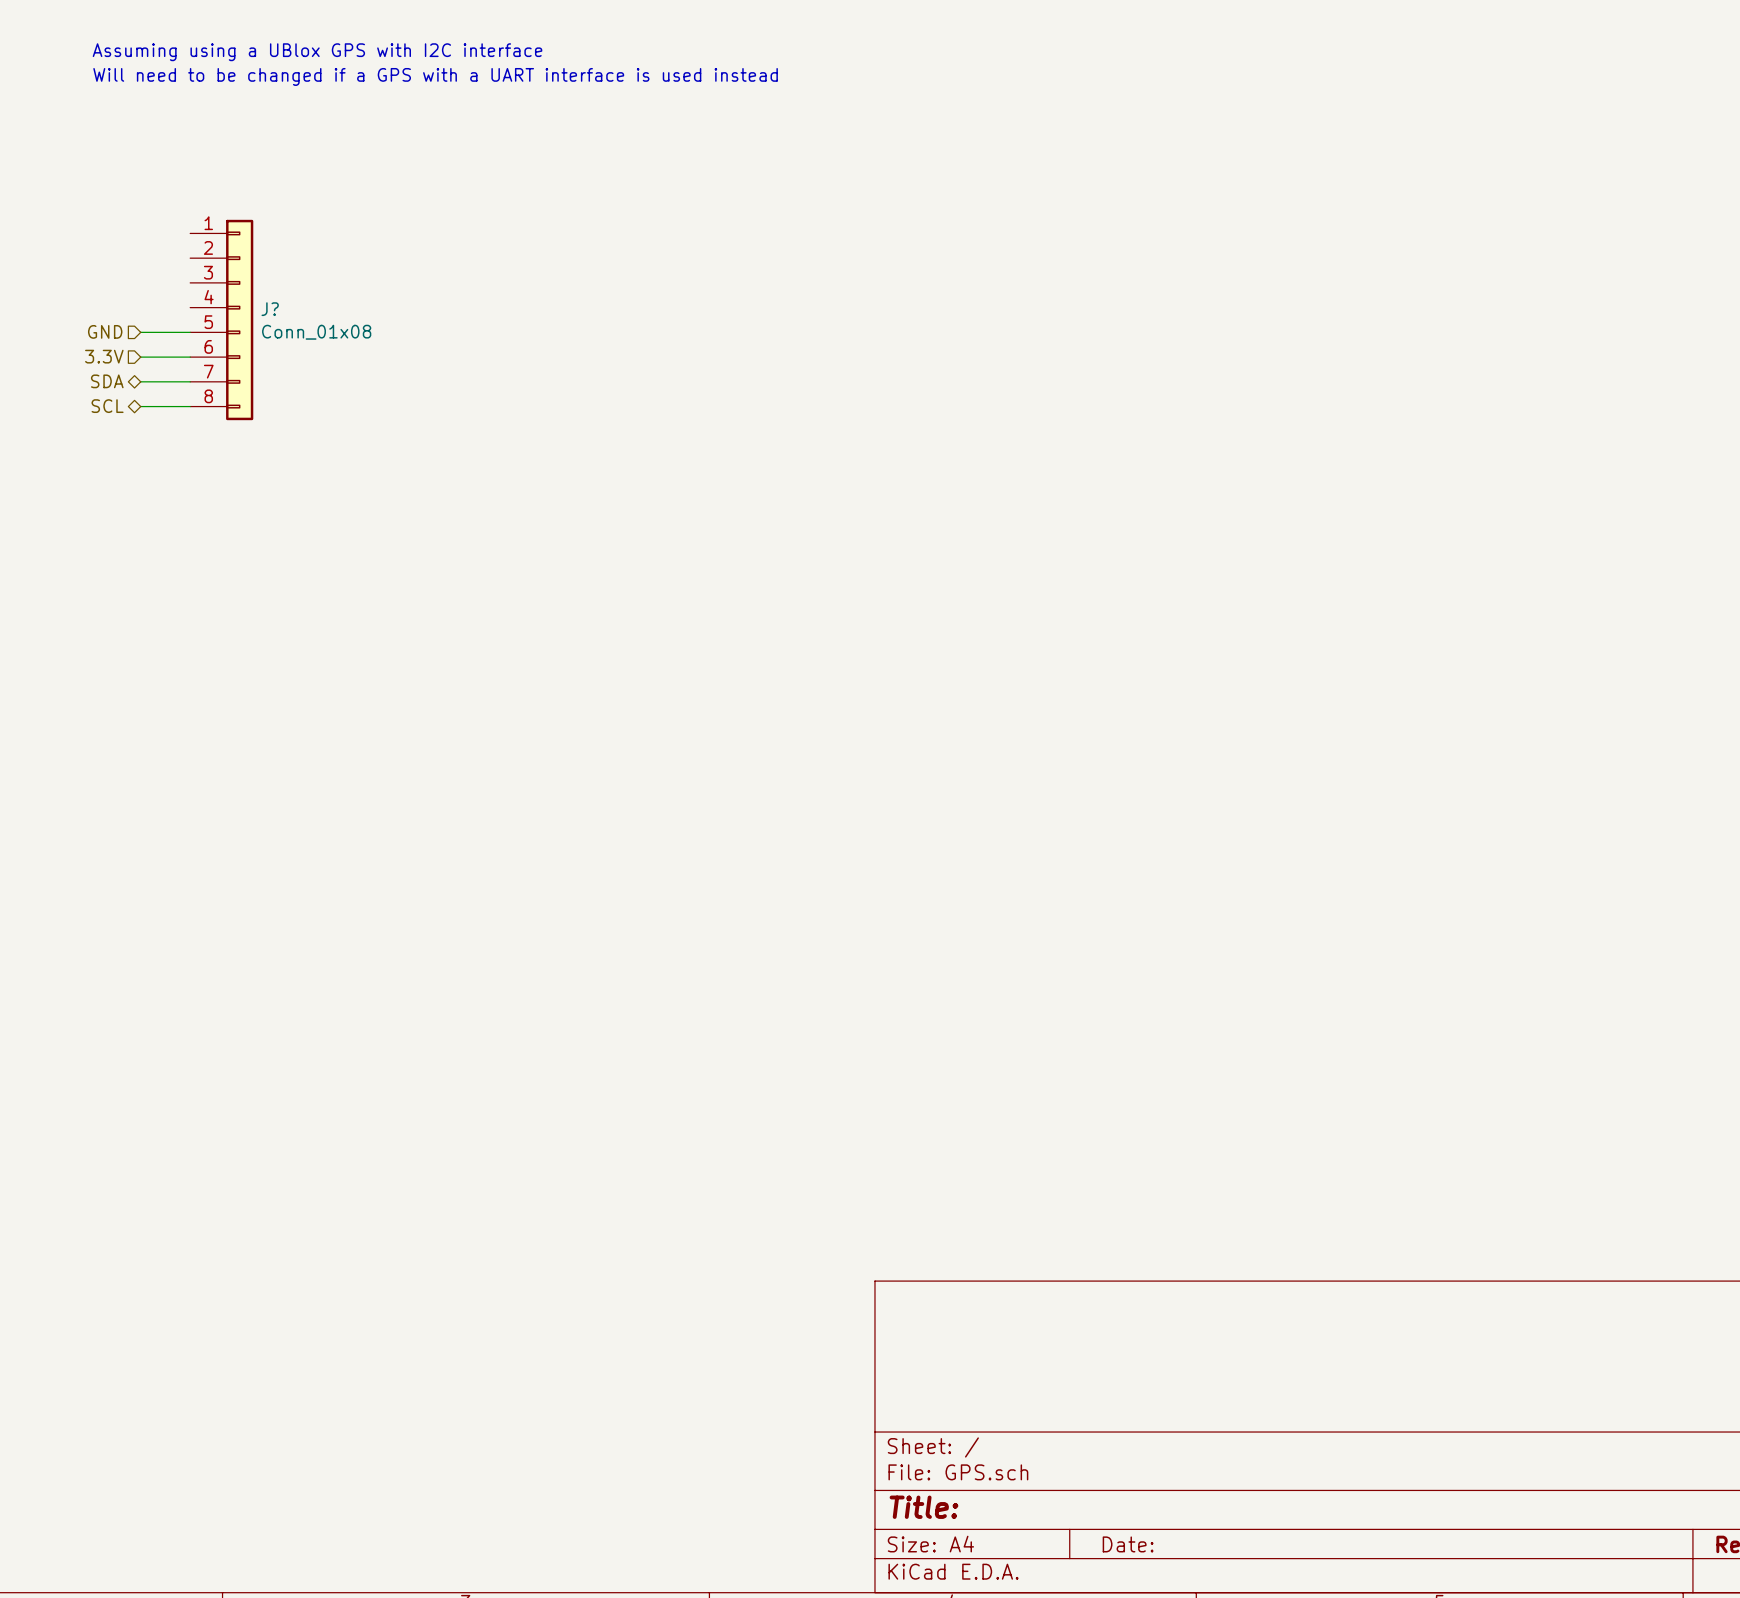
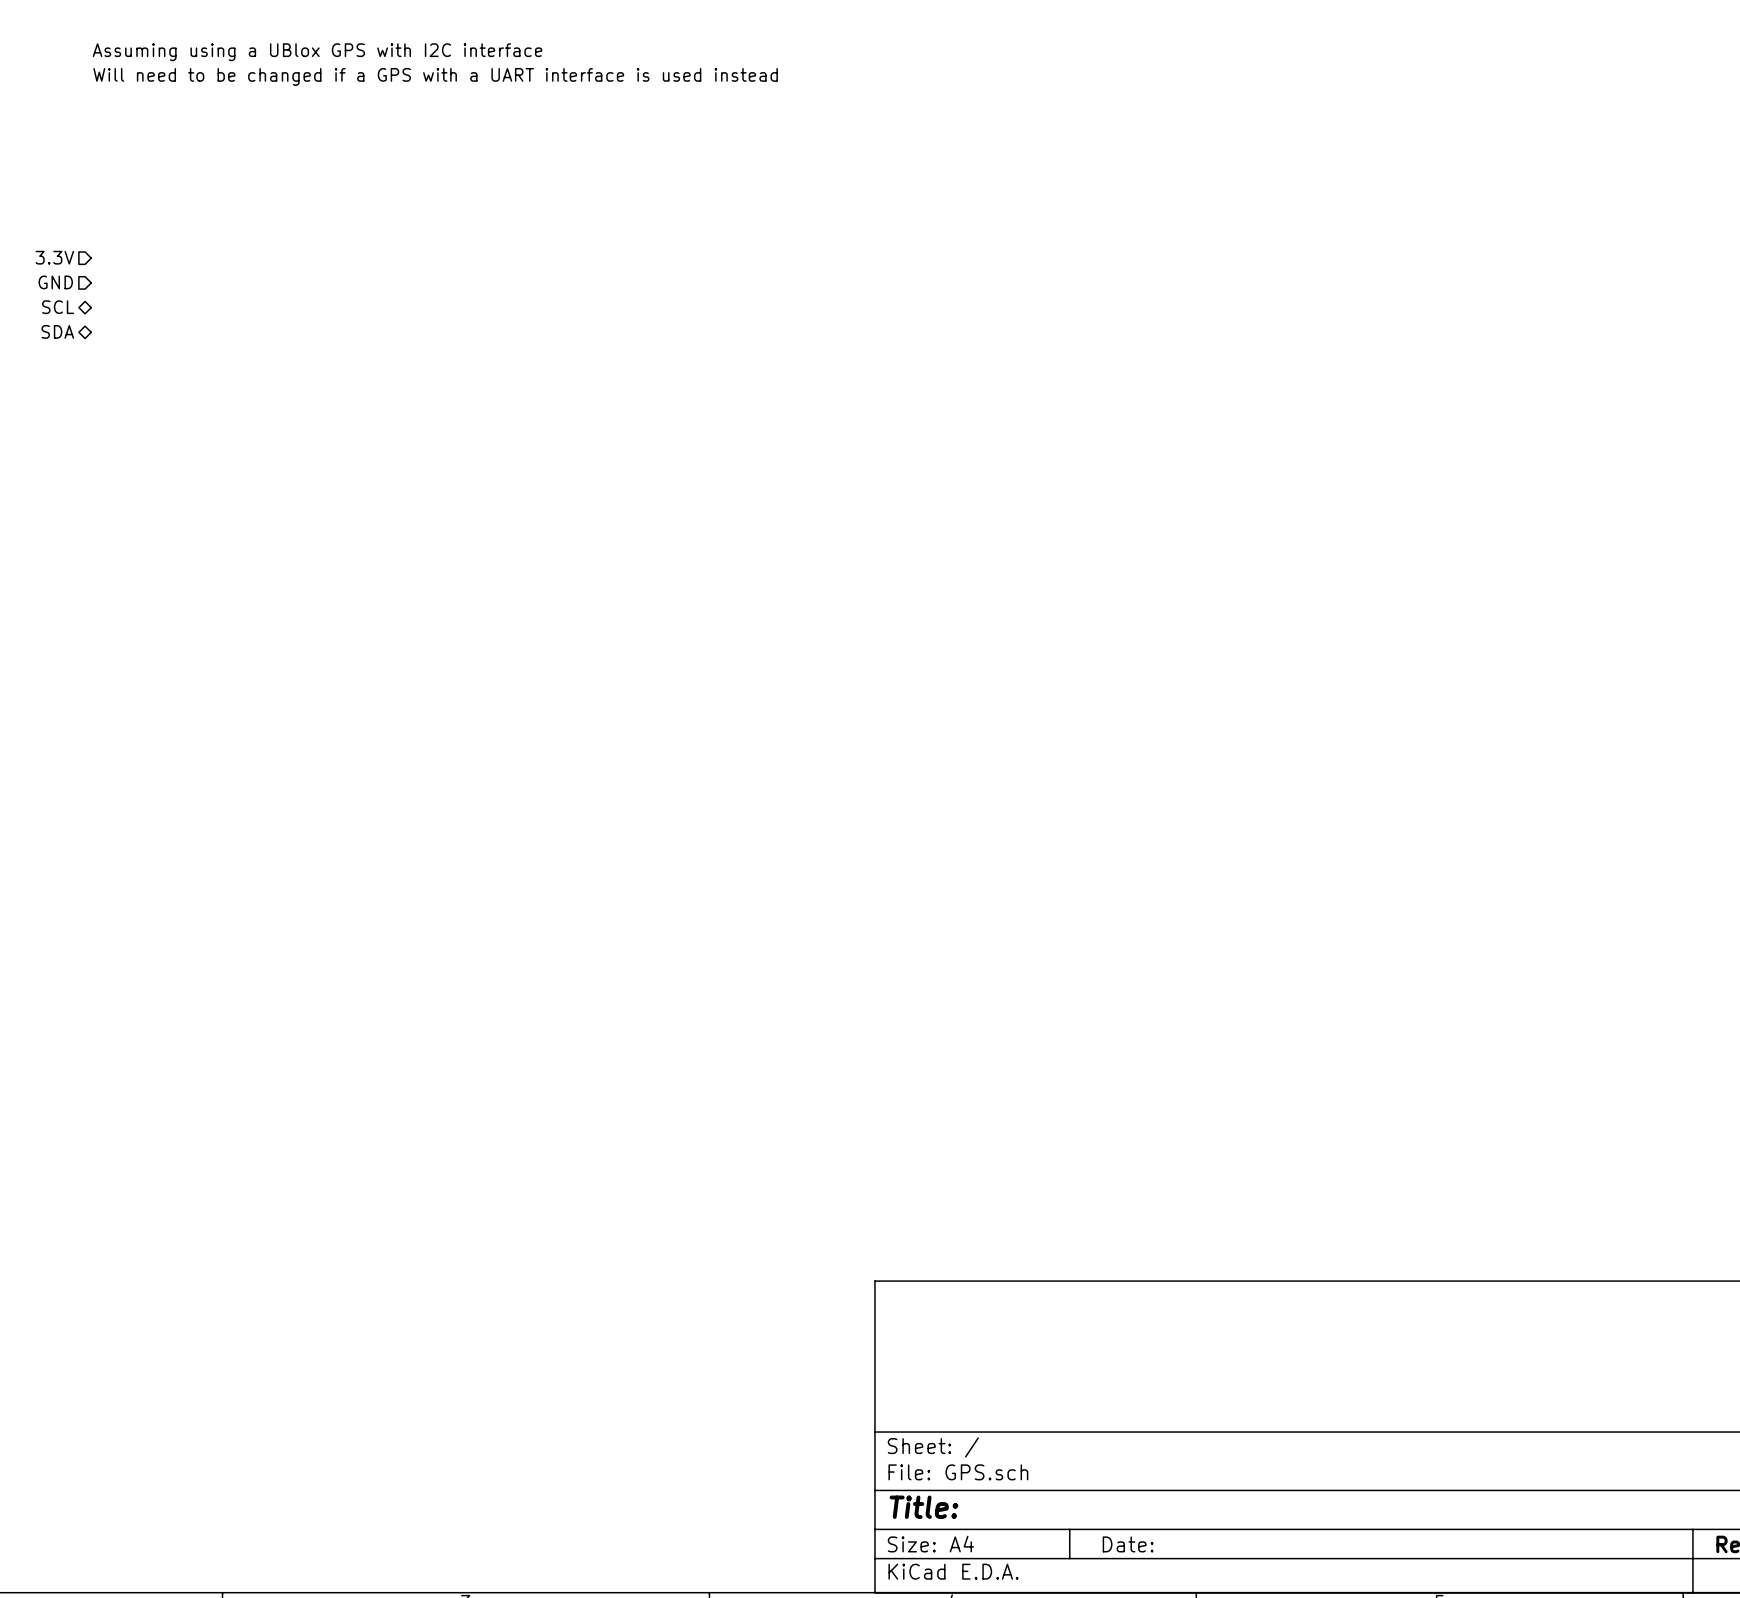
J?: Conn_01x08 (221, 320) -> none
hierarchical label position: GND (105, 331) -> GND (55, 282)
wire: (140, 332) (190, 332) -> none
hierarchical label position: 3.3V (104, 356) -> 3.3V (54, 257)
wire: (140, 357) (190, 357) -> none
hierarchical label position: SDA (107, 381) -> SDA (57, 331)
wire: (140, 381) (190, 381) -> none
hierarchical label position: SCL (107, 406) -> SCL (58, 307)
wire: (140, 406) (190, 406) -> none

